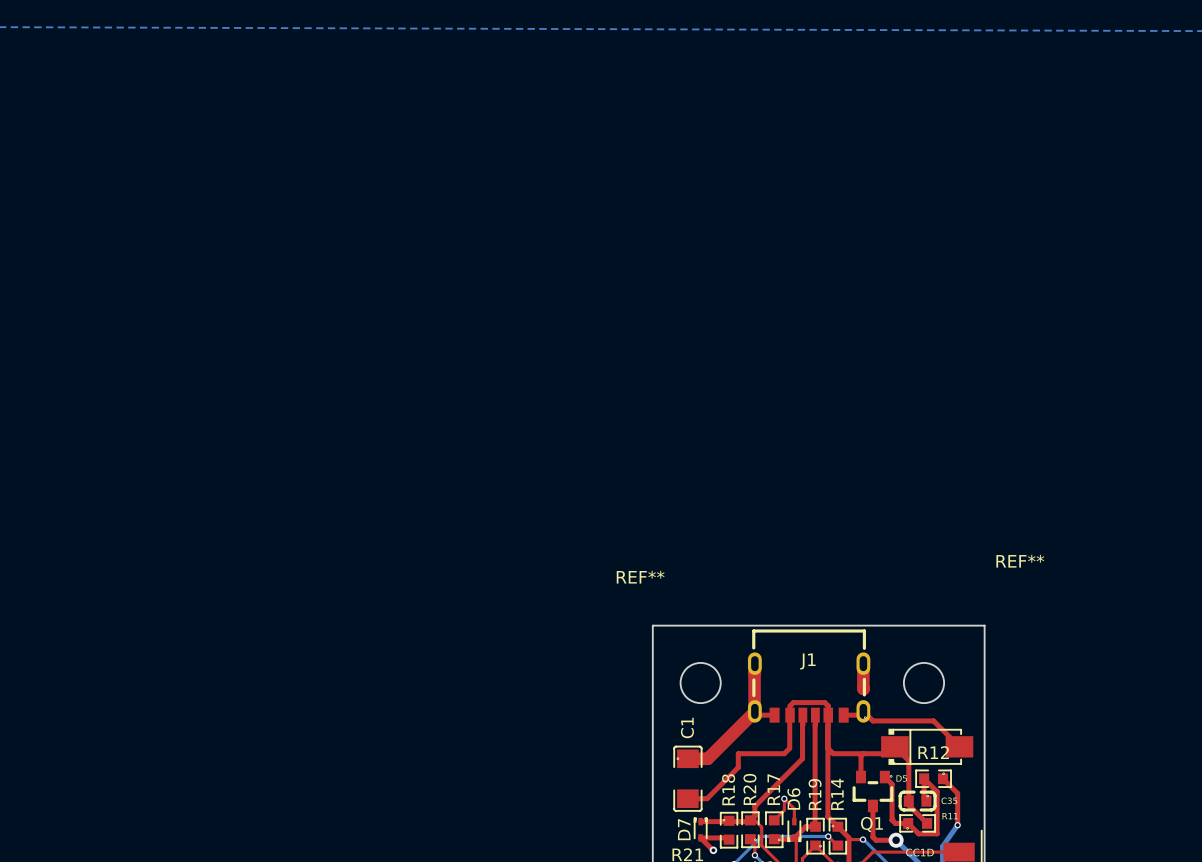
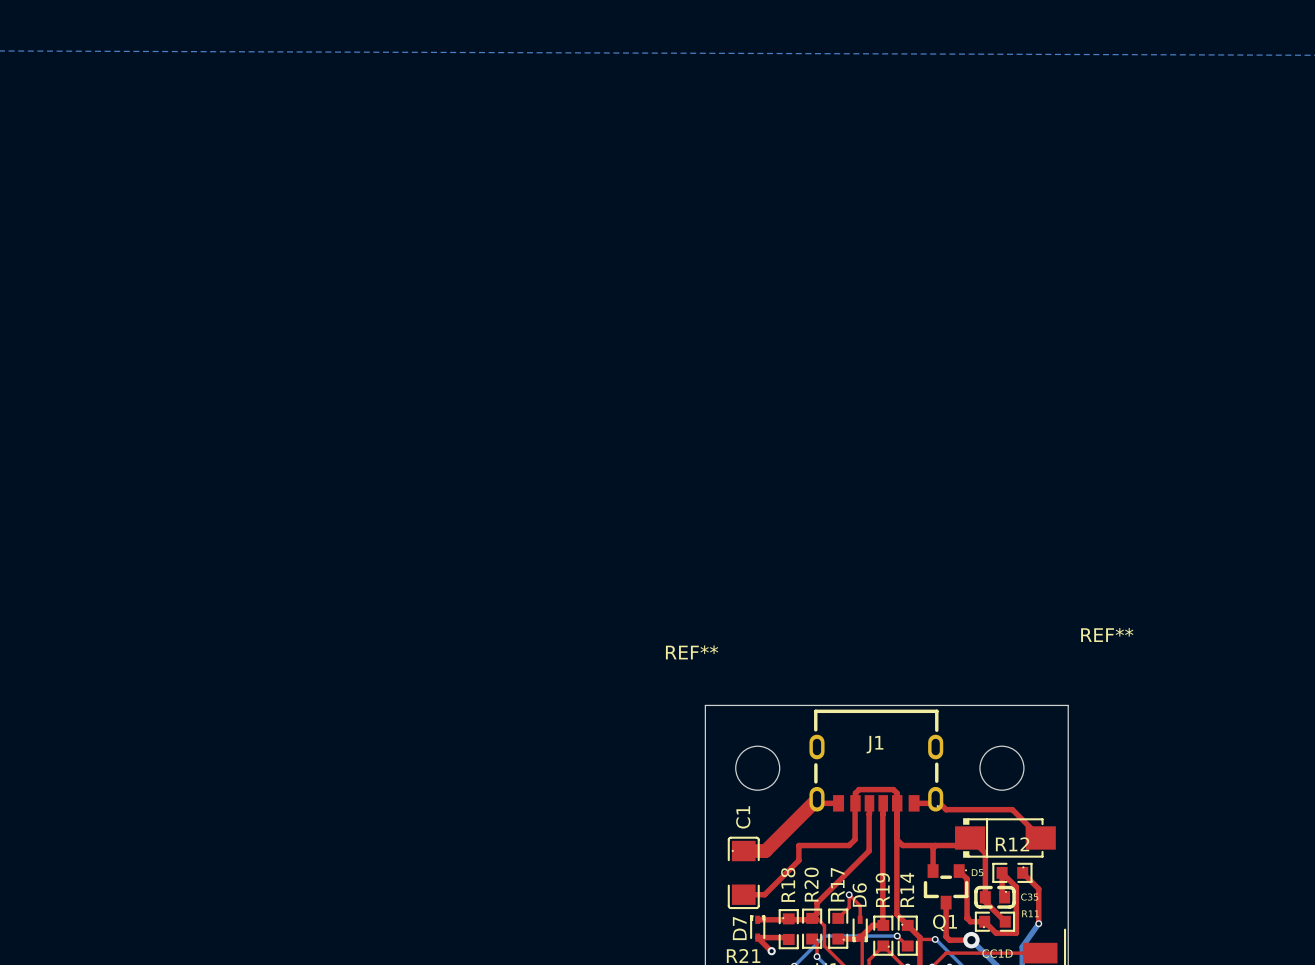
top track: (754, 663) (754, 712) -> none
top track: (863, 689) (863, 688) (863, 663) (863, 673) (866, 676) (866, 689) -> none

